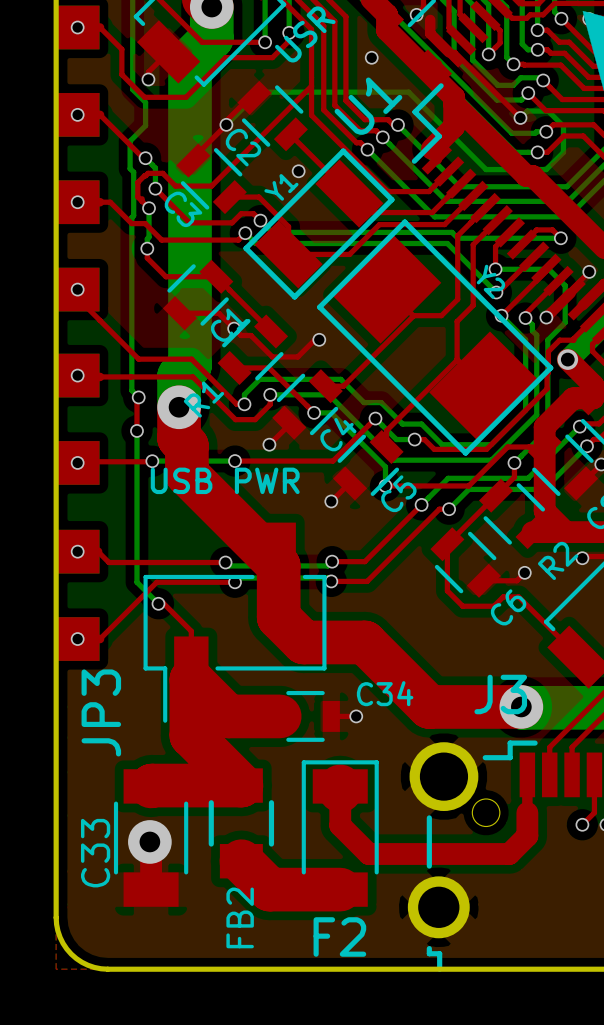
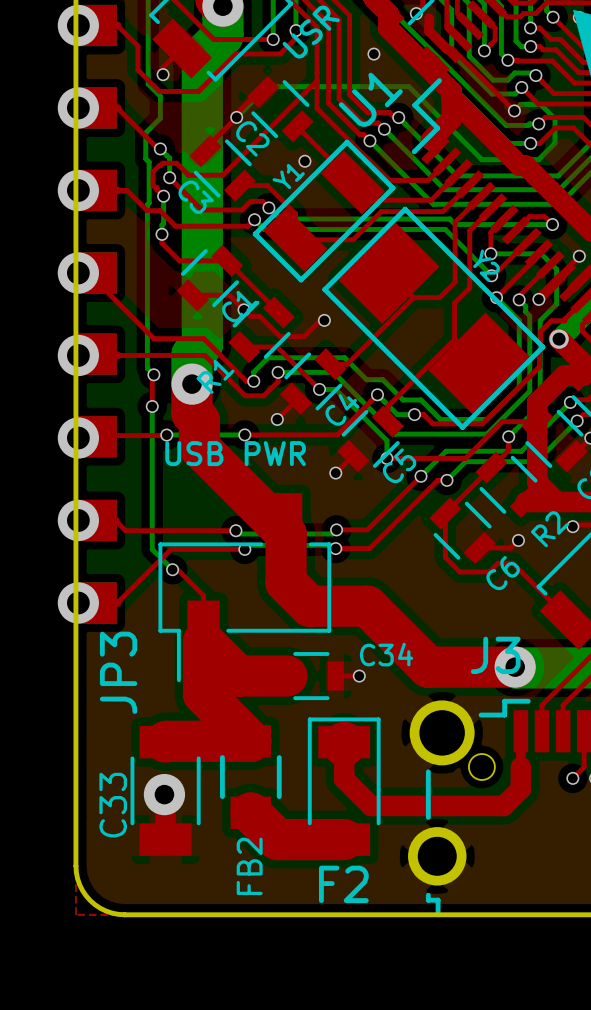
via size: [70, 20, 85, 35] -> [57, 4, 100, 47]
via size: [70, 107, 85, 122] -> [57, 87, 100, 129]
via size: [70, 195, 85, 210] -> [57, 169, 100, 212]
via size: [70, 282, 85, 297] -> [57, 252, 100, 294]
via size: [70, 368, 85, 383] -> [57, 334, 100, 377]
via size: [70, 456, 85, 470] -> [57, 417, 100, 459]
via size: [70, 544, 85, 559] -> [57, 499, 100, 542]
via size: [70, 632, 85, 646] -> [57, 582, 100, 624]

